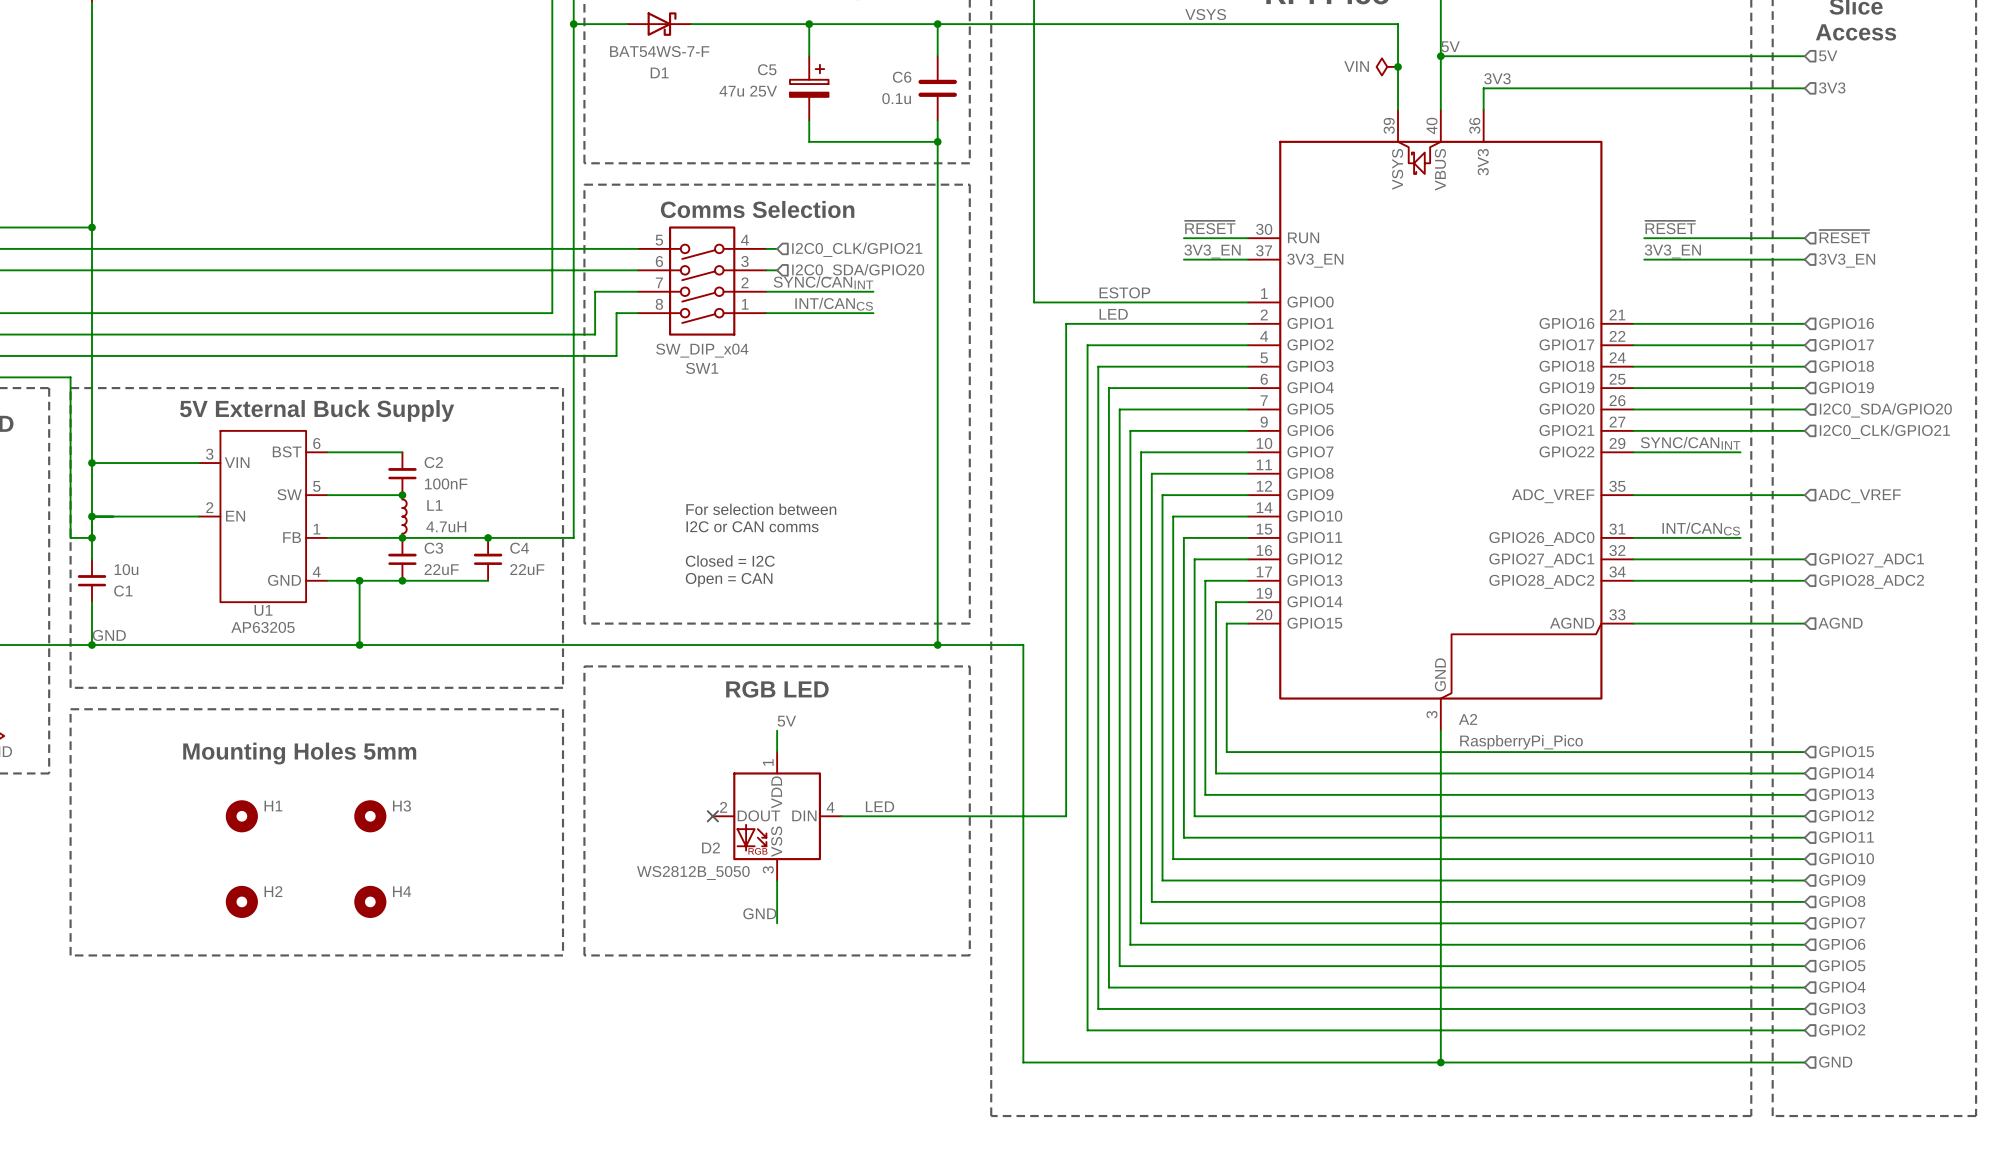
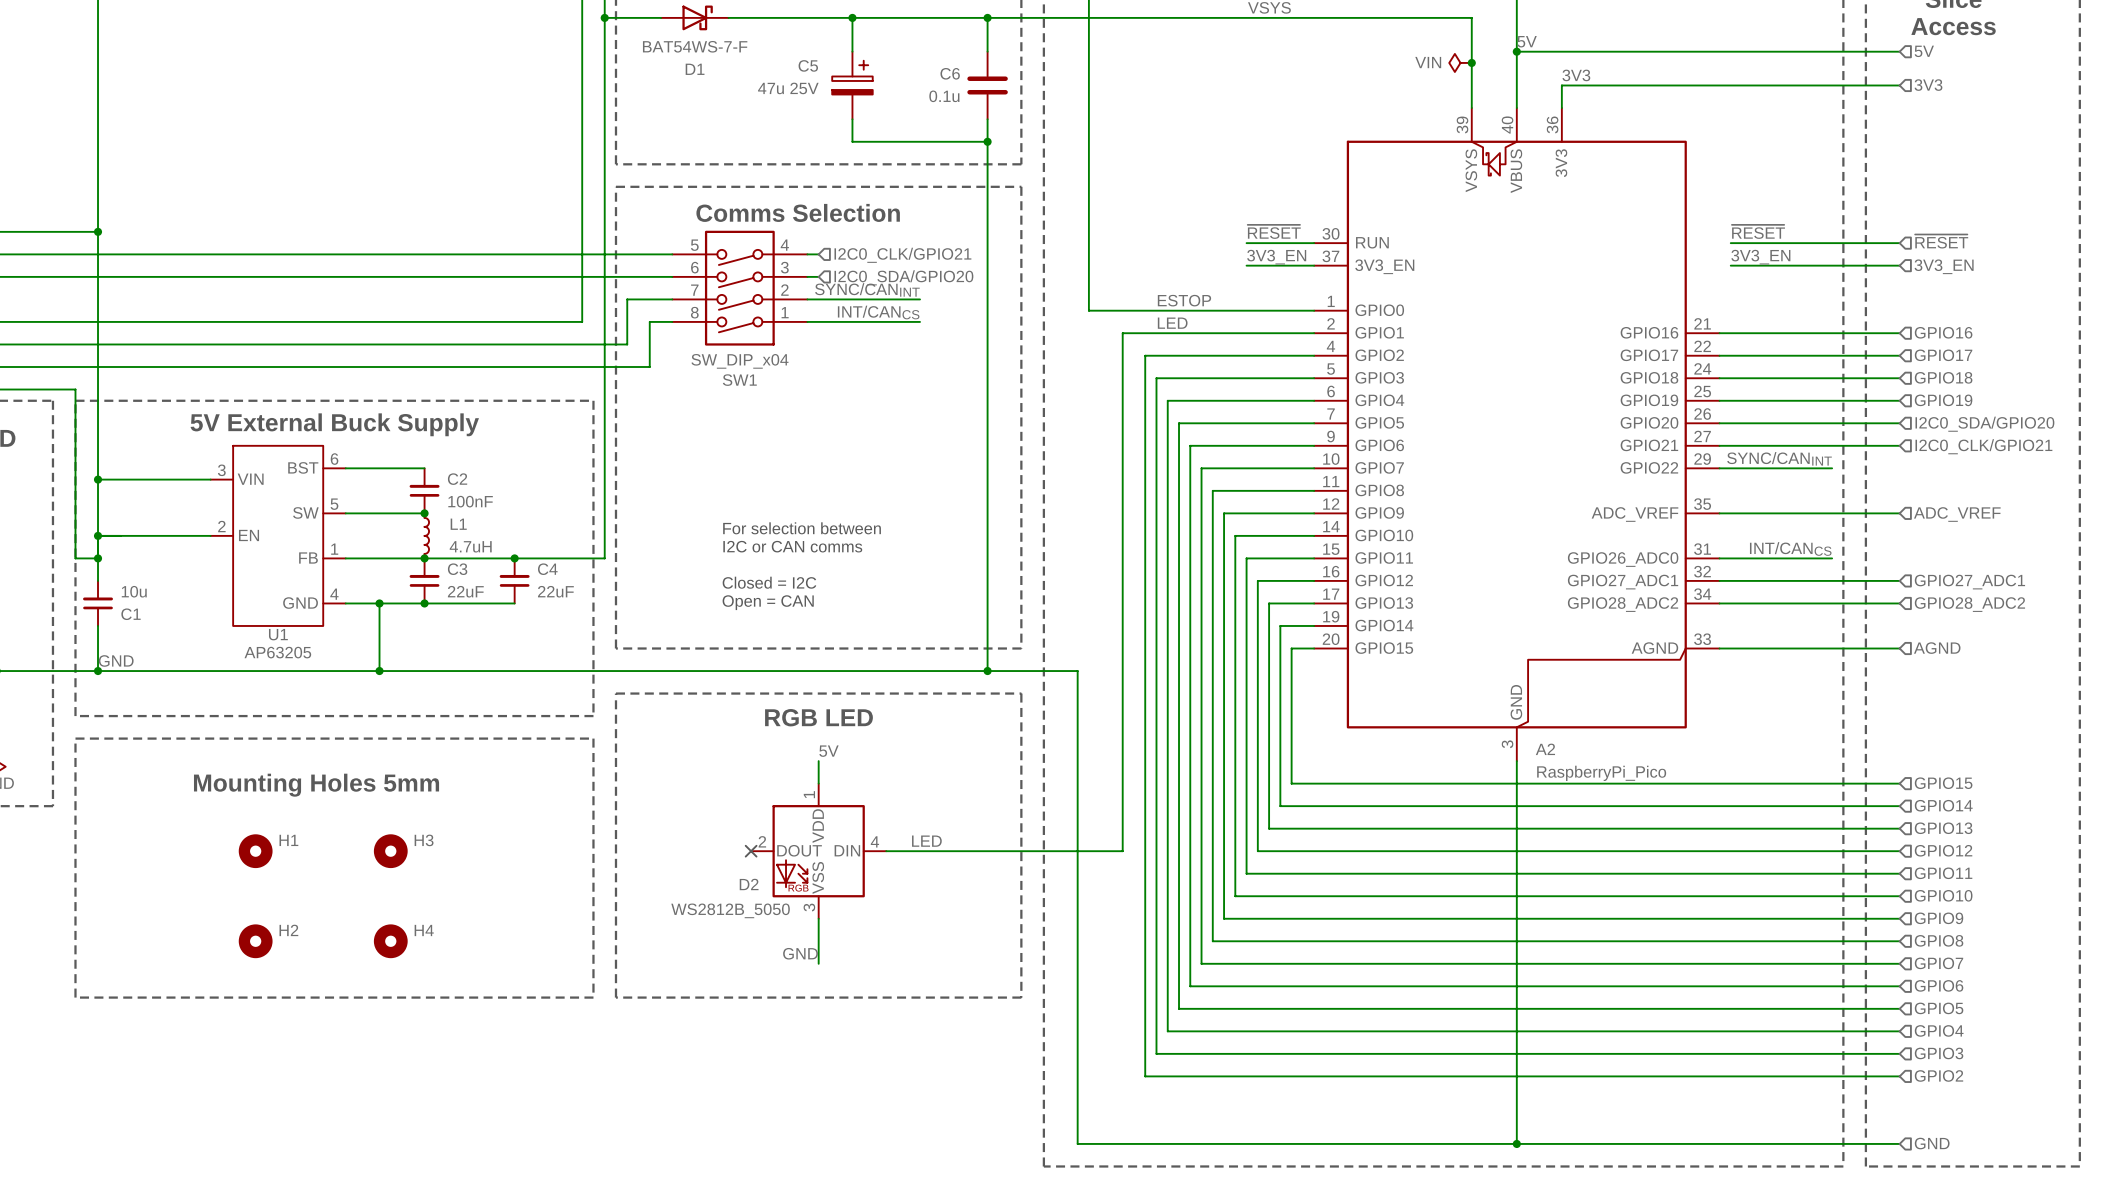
wire: (1023, 1062) (1804, 1062) -> (1077, 1110) (1077, 1143) (1899, 1143)
wire: none -> (1516, 1110) (1516, 1143)
junction position: (1440, 1062) -> (1516, 1143)
hierarchical label position: GND (1835, 1062) -> GND (1932, 1143)

